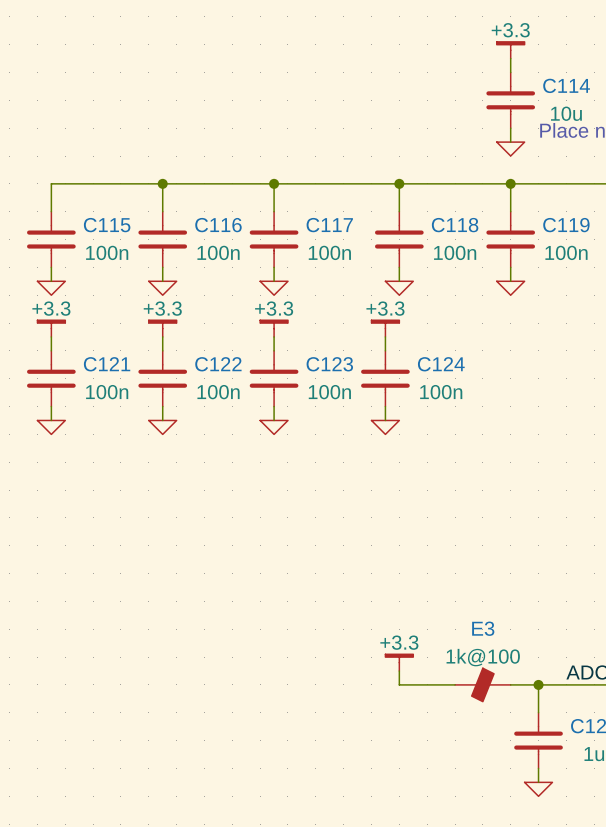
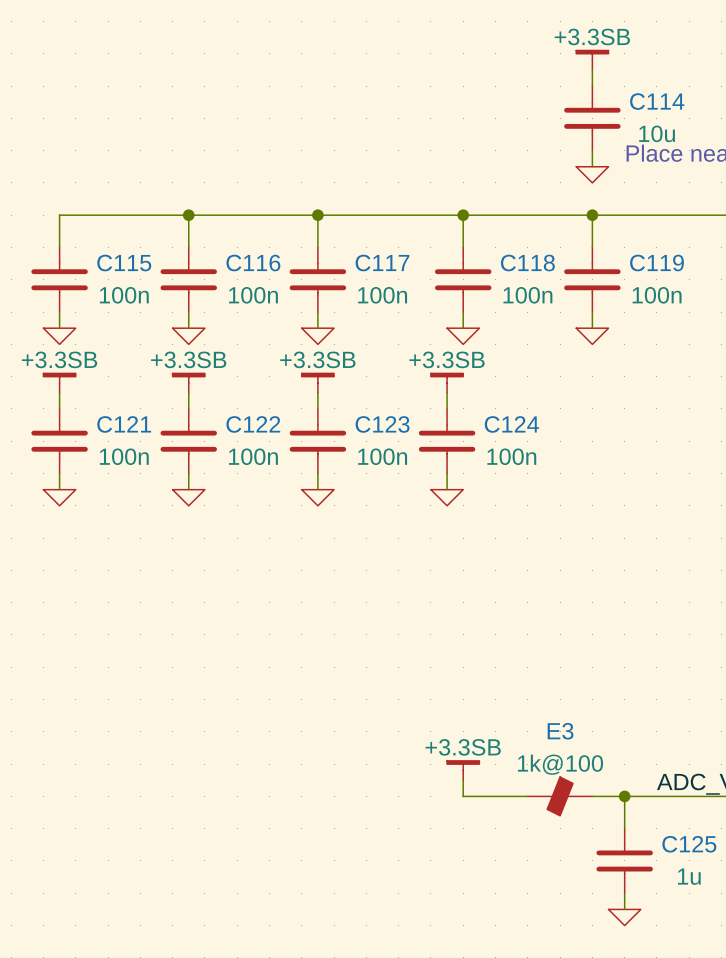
power symbol: +3.3 (510, 50) -> +3.3SB (592, 60)
power symbol: +3.3 (51, 328) -> +3.3SB (59, 383)
power symbol: +3.3 (162, 328) -> +3.3SB (188, 383)
power symbol: +3.3 (274, 328) -> +3.3SB (317, 383)
power symbol: +3.3 (385, 328) -> +3.3SB (447, 383)
power symbol: +3.3 (399, 662) -> +3.3SB (463, 770)

